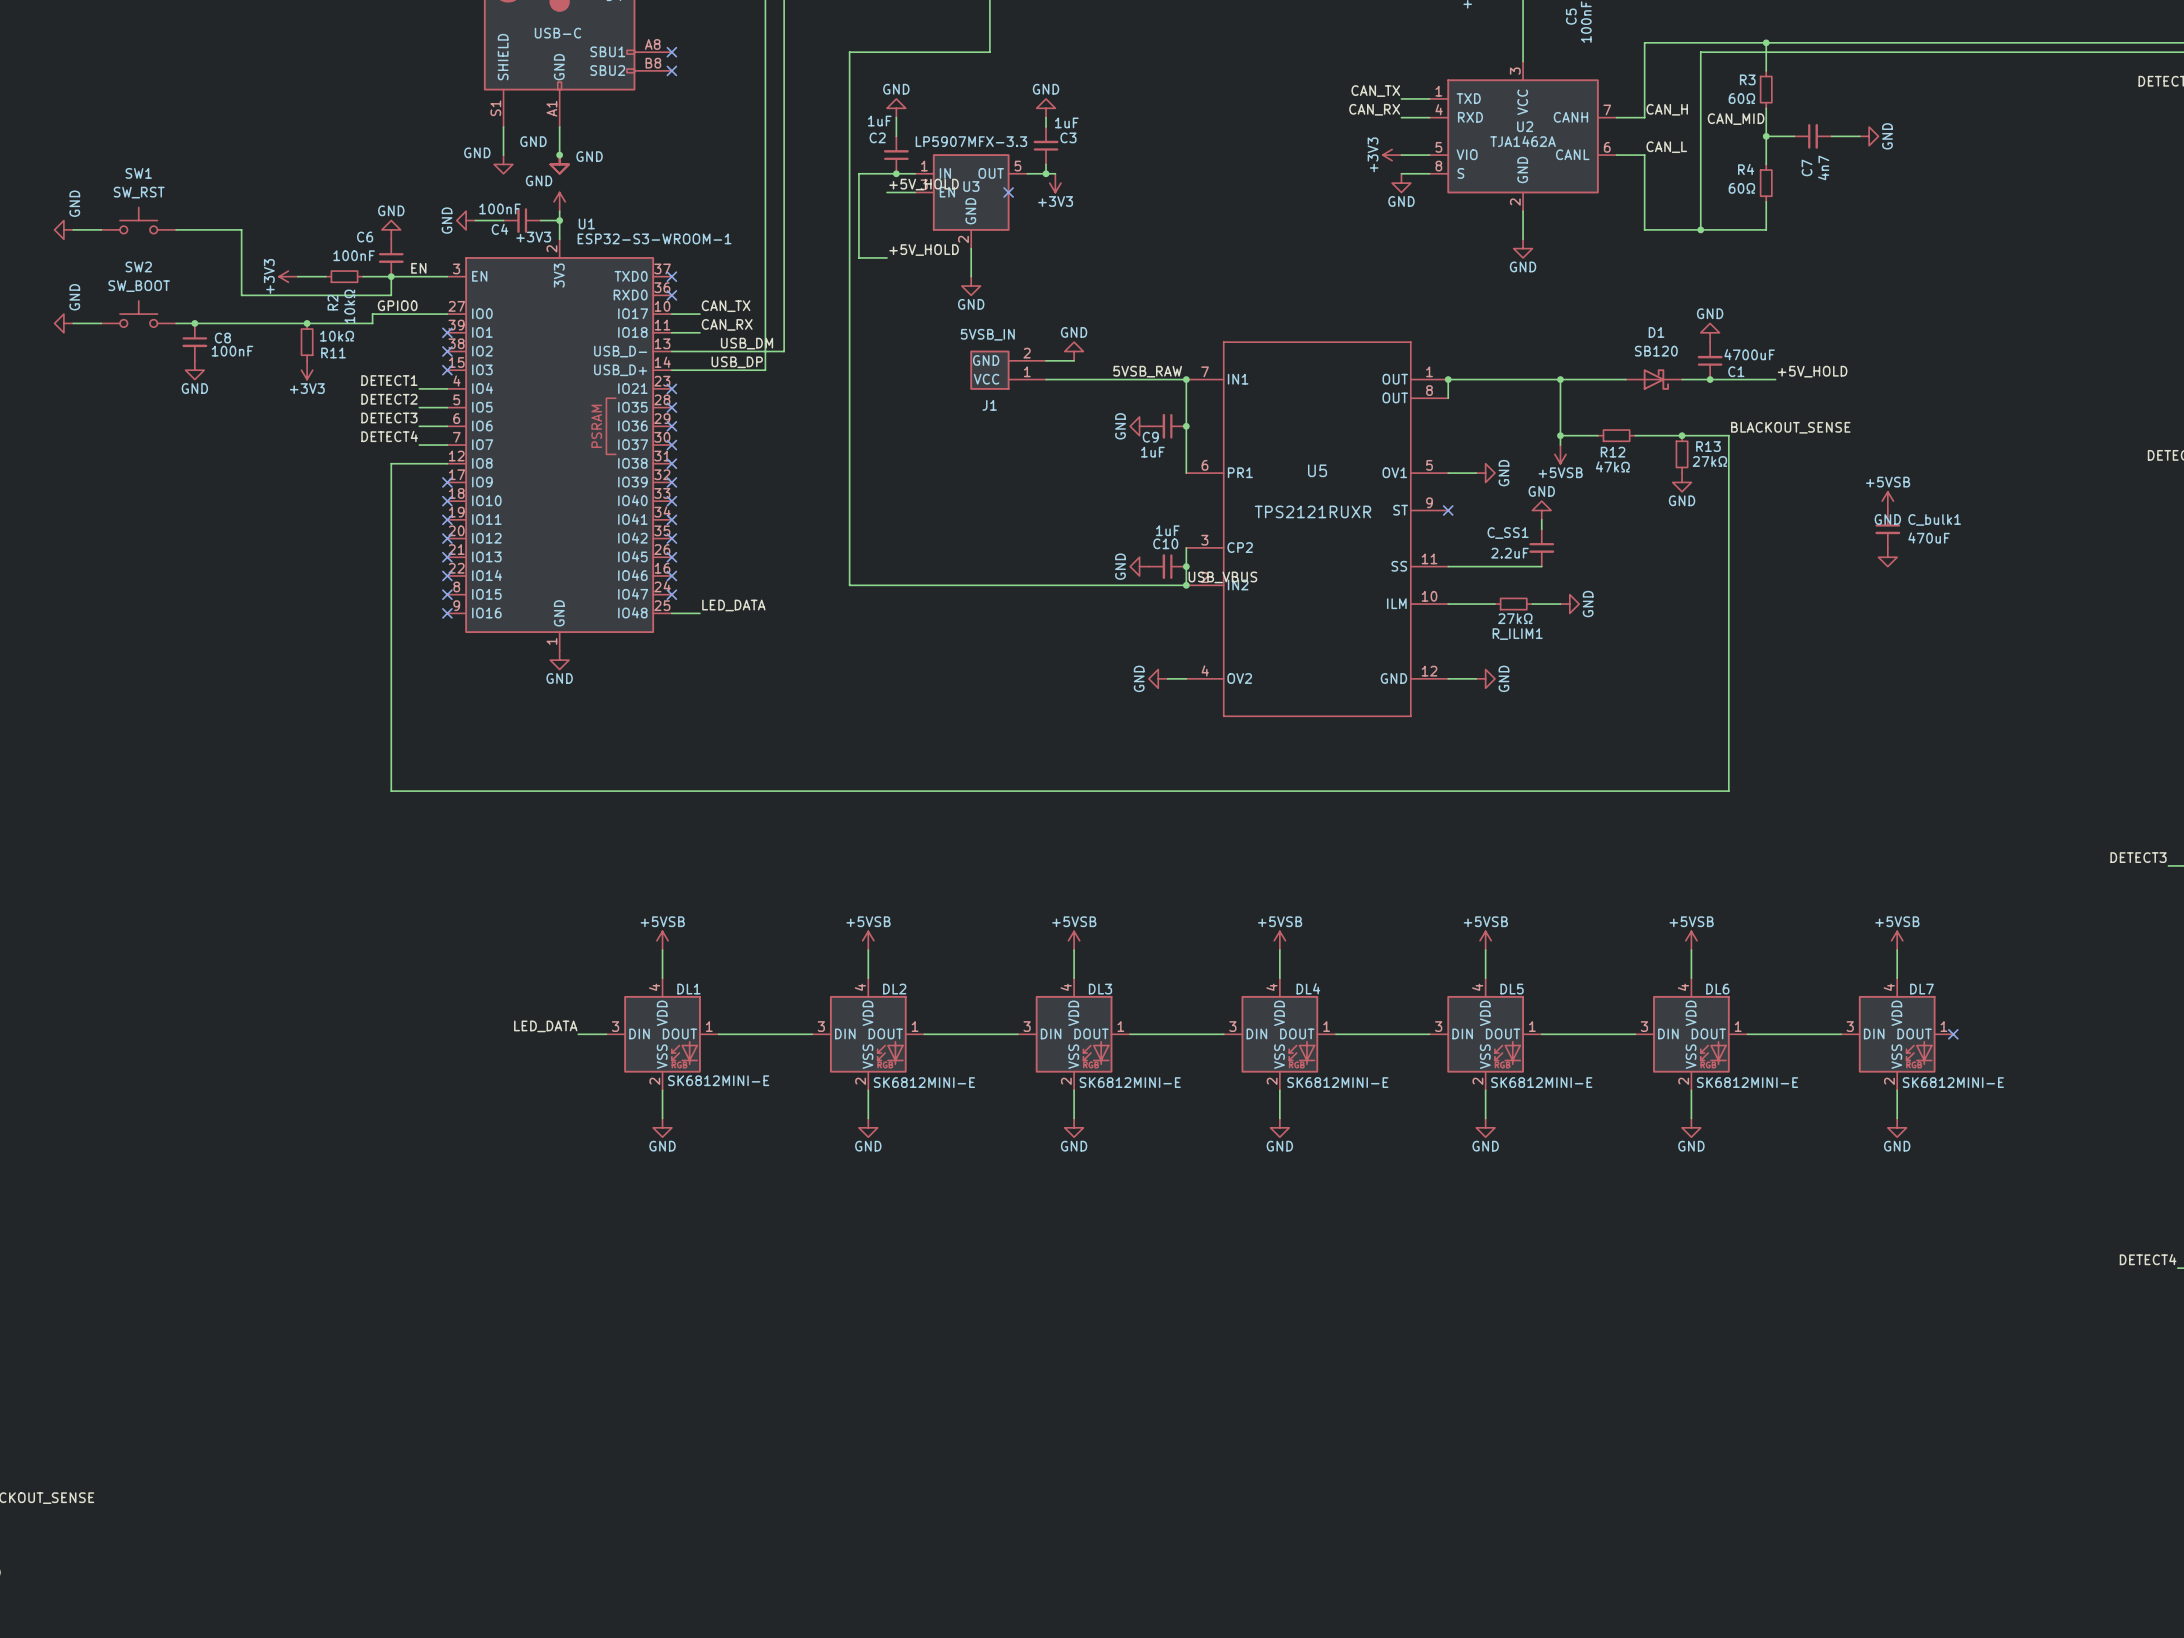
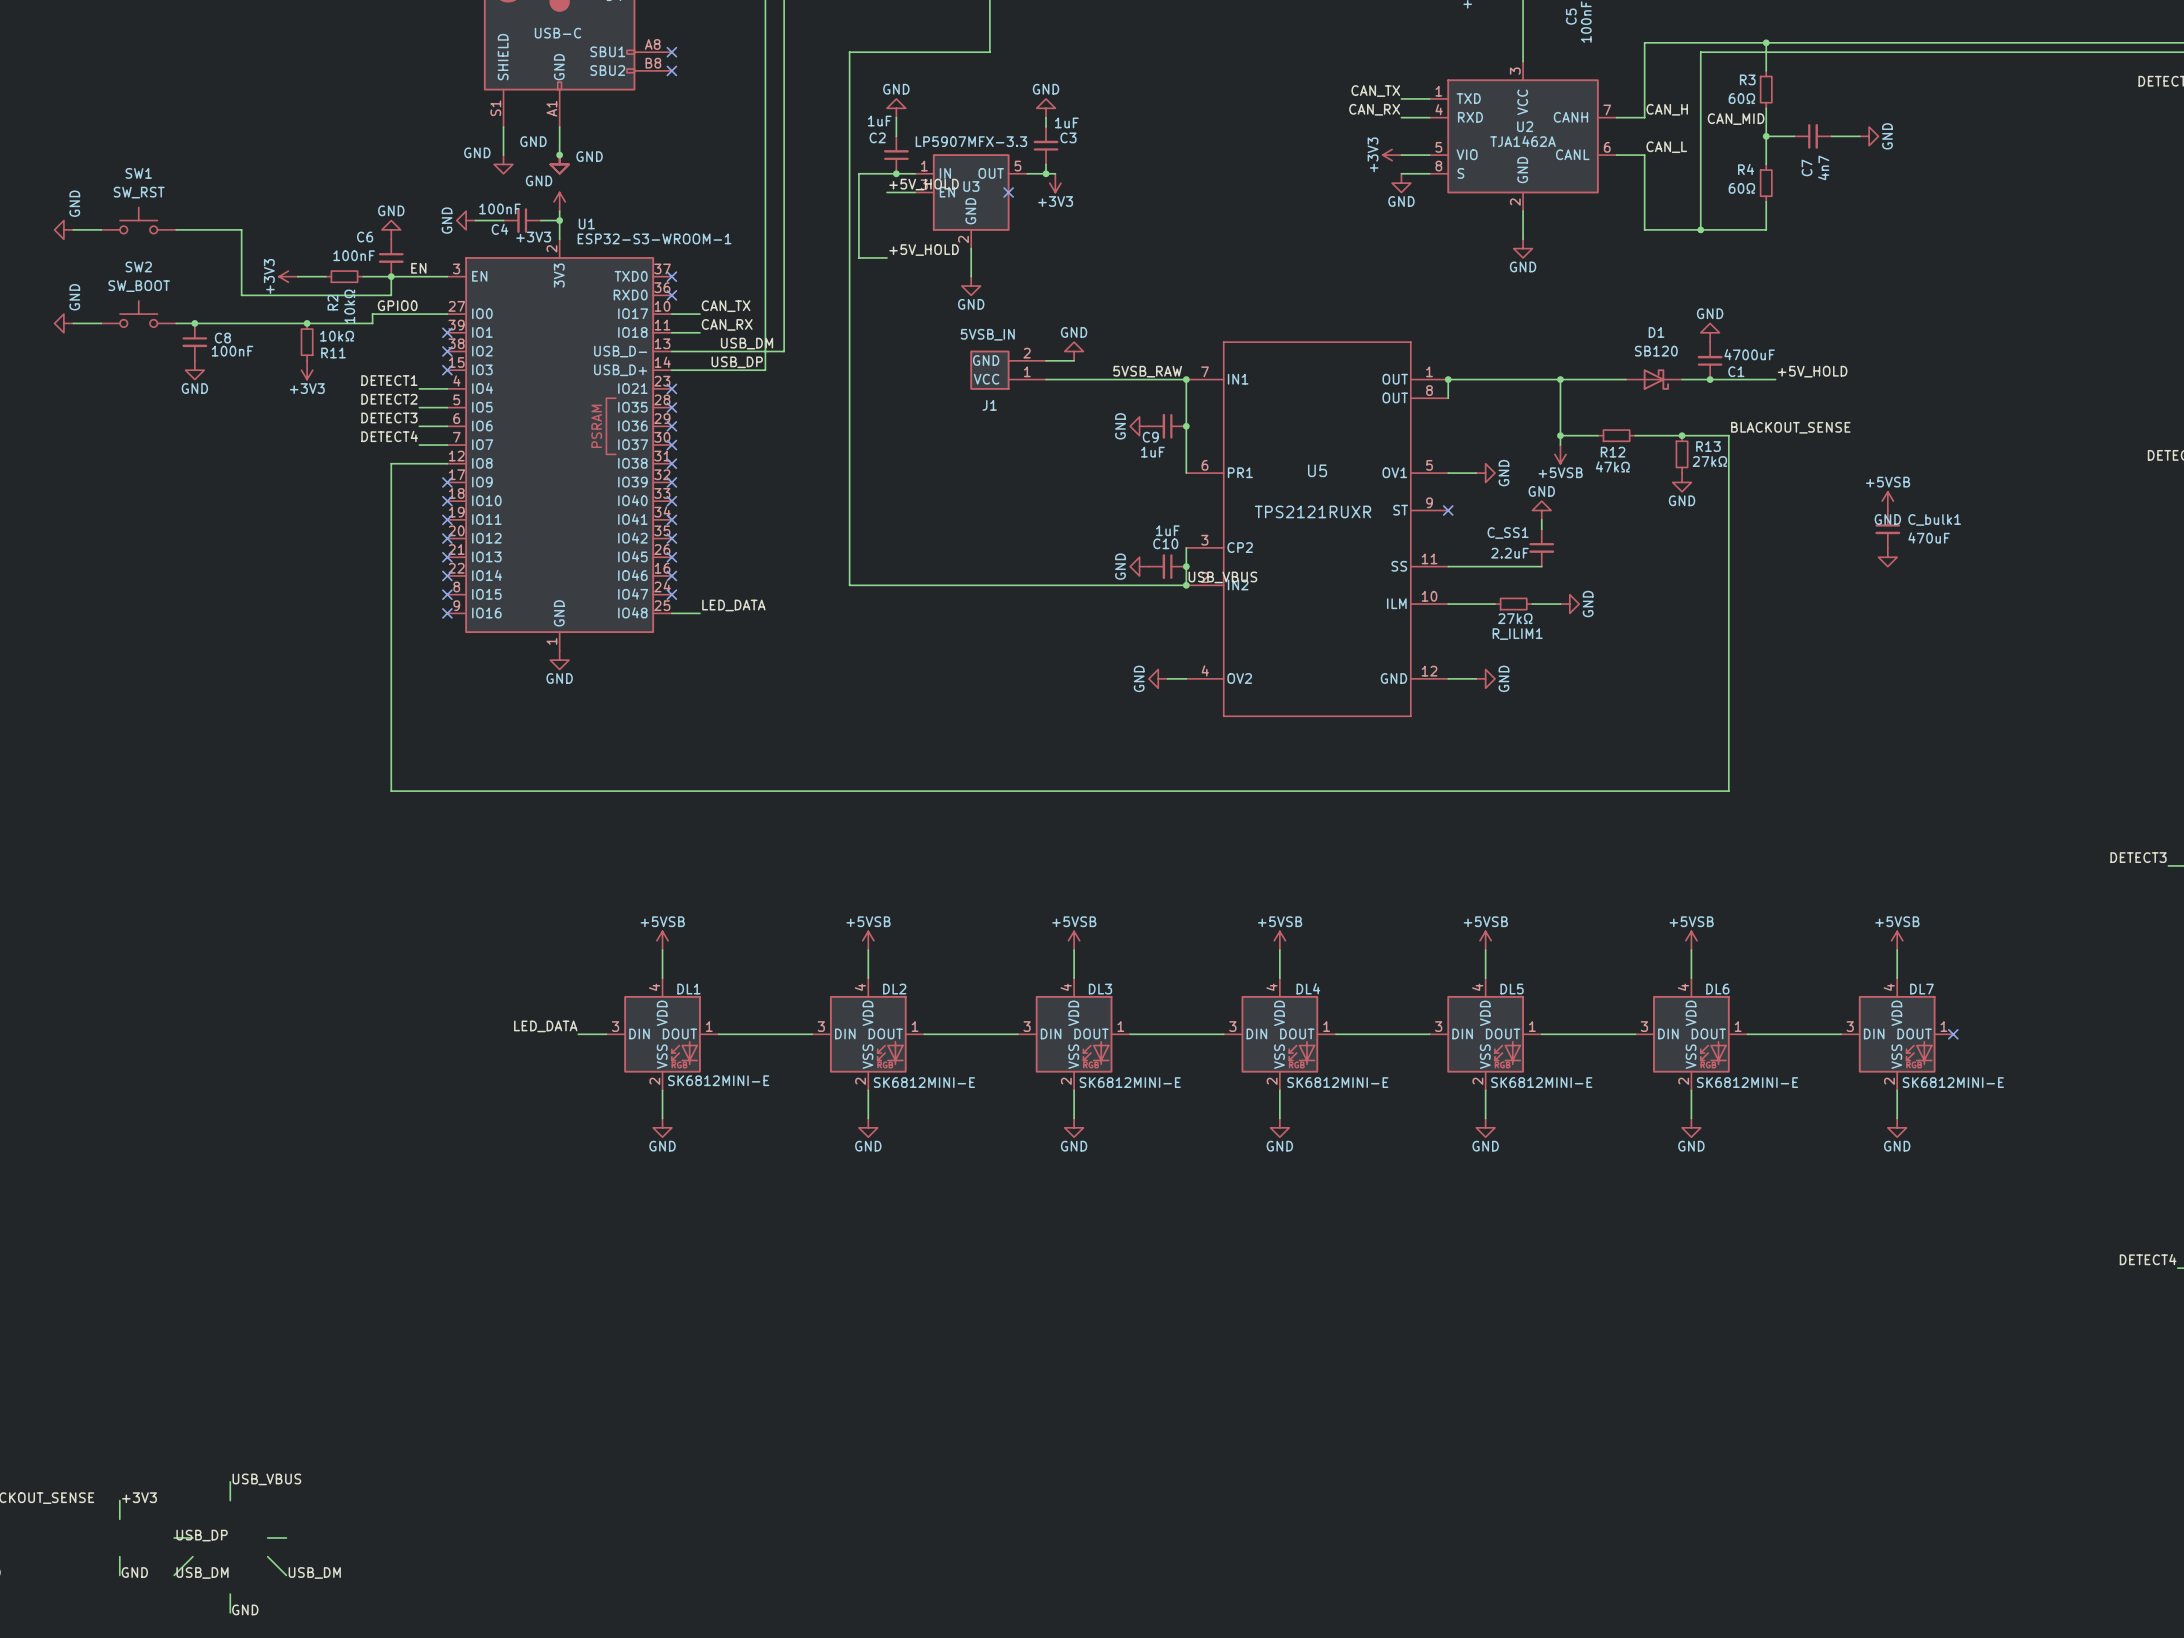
label: none -> USB_VBUS (266, 1479)
wire: none -> (230, 1481) (230, 1500)
label: none -> +3V3 (139, 1497)
wire: none -> (119, 1500) (119, 1519)
label: none -> USB_DP (202, 1535)
wire: none -> (174, 1537) (192, 1537)
wire: none -> (267, 1537) (286, 1537)
wire: none -> (119, 1556) (119, 1575)
wire: none -> (192, 1556) (174, 1575)
wire: none -> (267, 1556) (286, 1575)
label: none -> GND (134, 1572)
label: none -> USB_DM (202, 1572)
label: none -> USB_DM (314, 1572)
wire: none -> (230, 1594) (230, 1612)
label: none -> GND (245, 1609)

